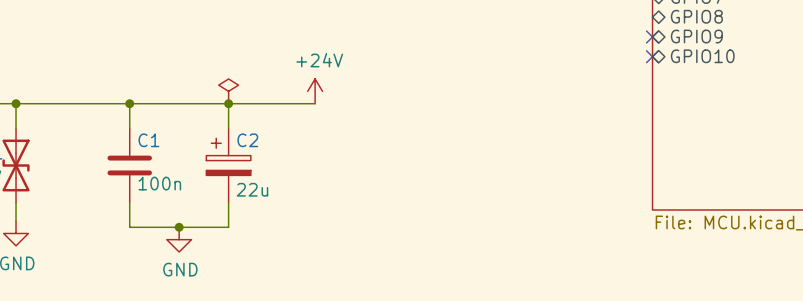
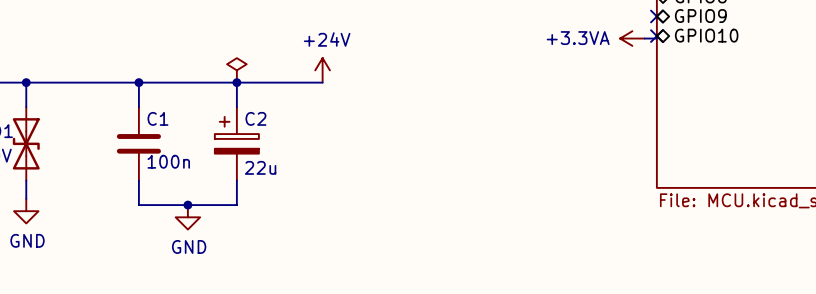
power symbol: none -> +3.3VA (632, 38)
wire: none -> (644, 38) (656, 38)

